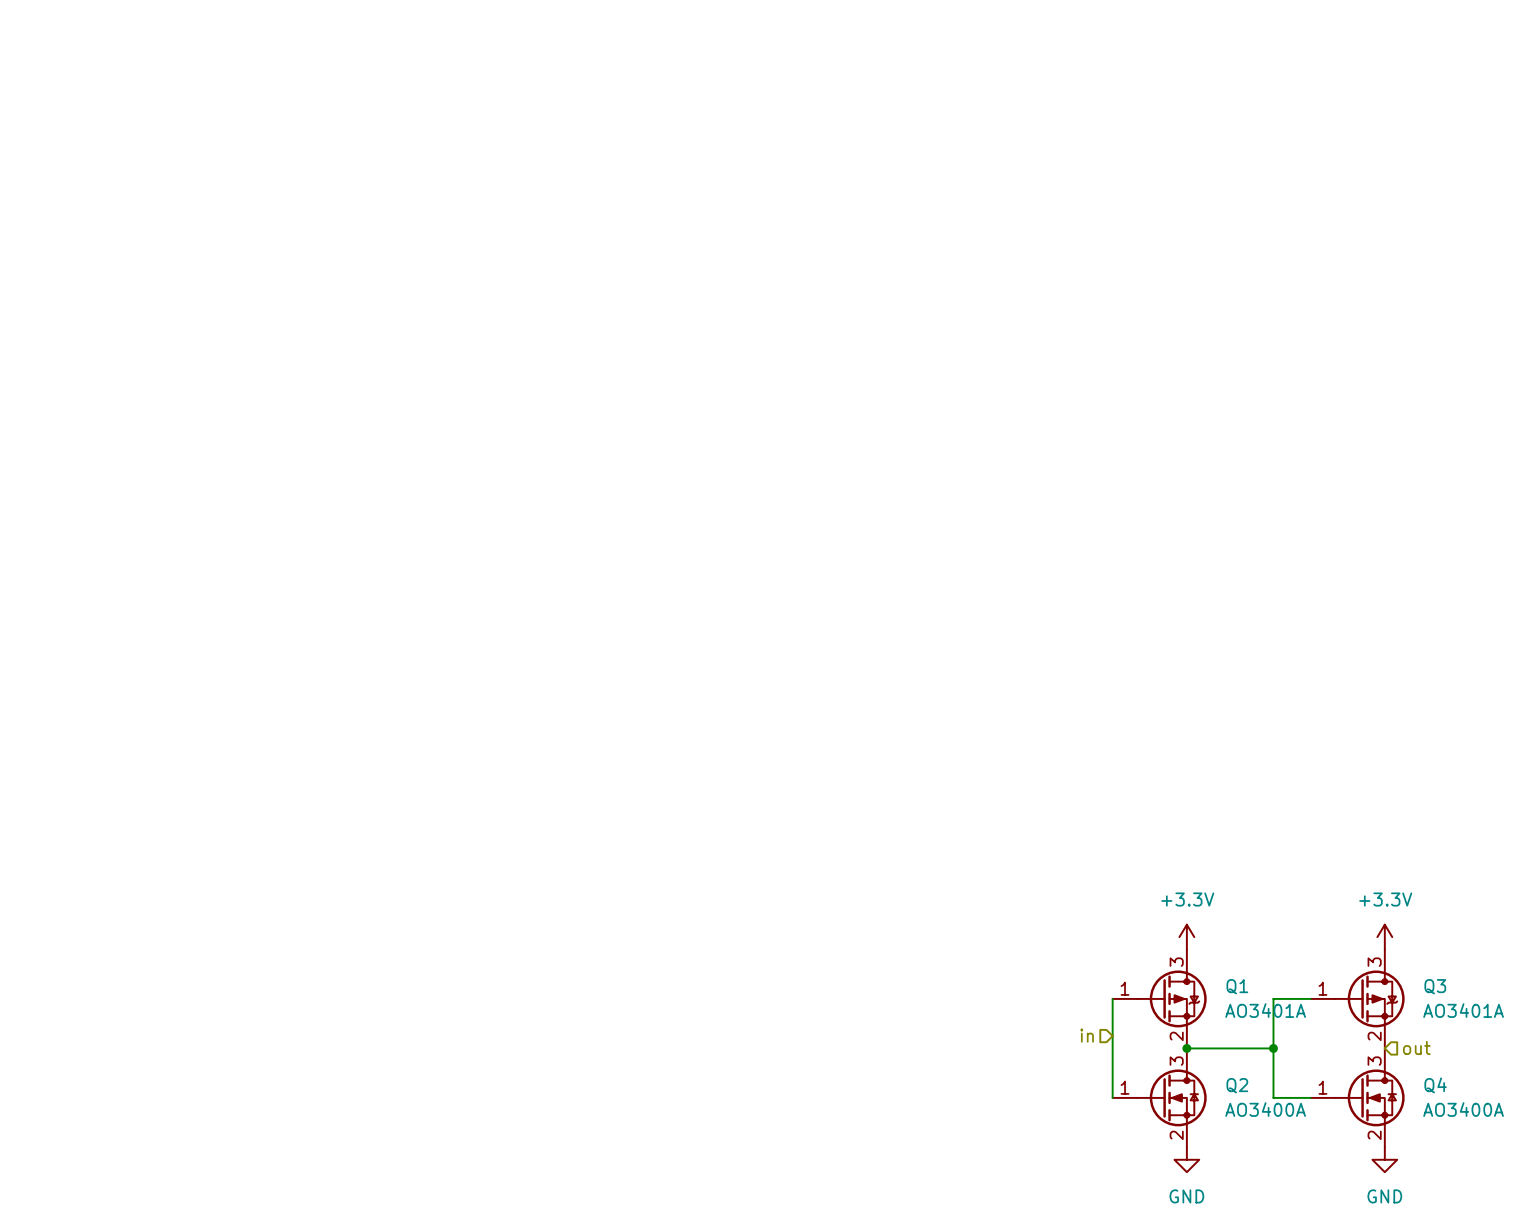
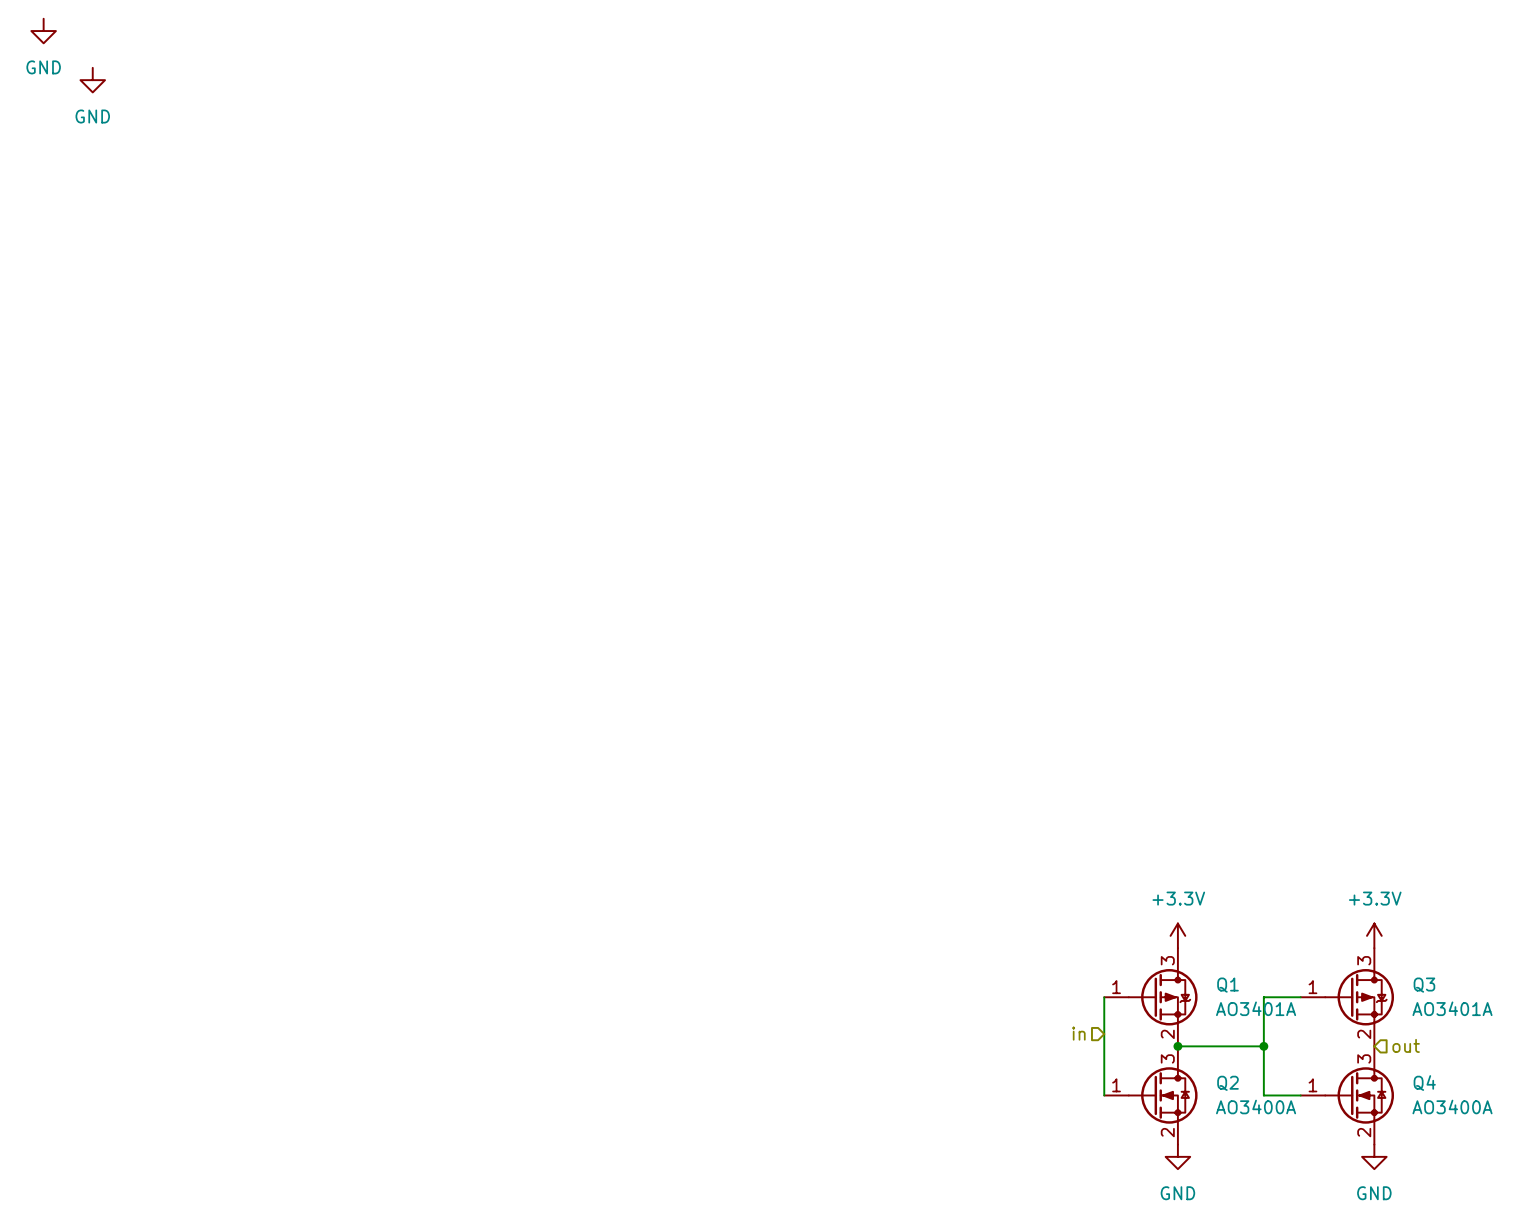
power symbol: none -> GND (43, 31)
power symbol: none -> GND (92, 80)

